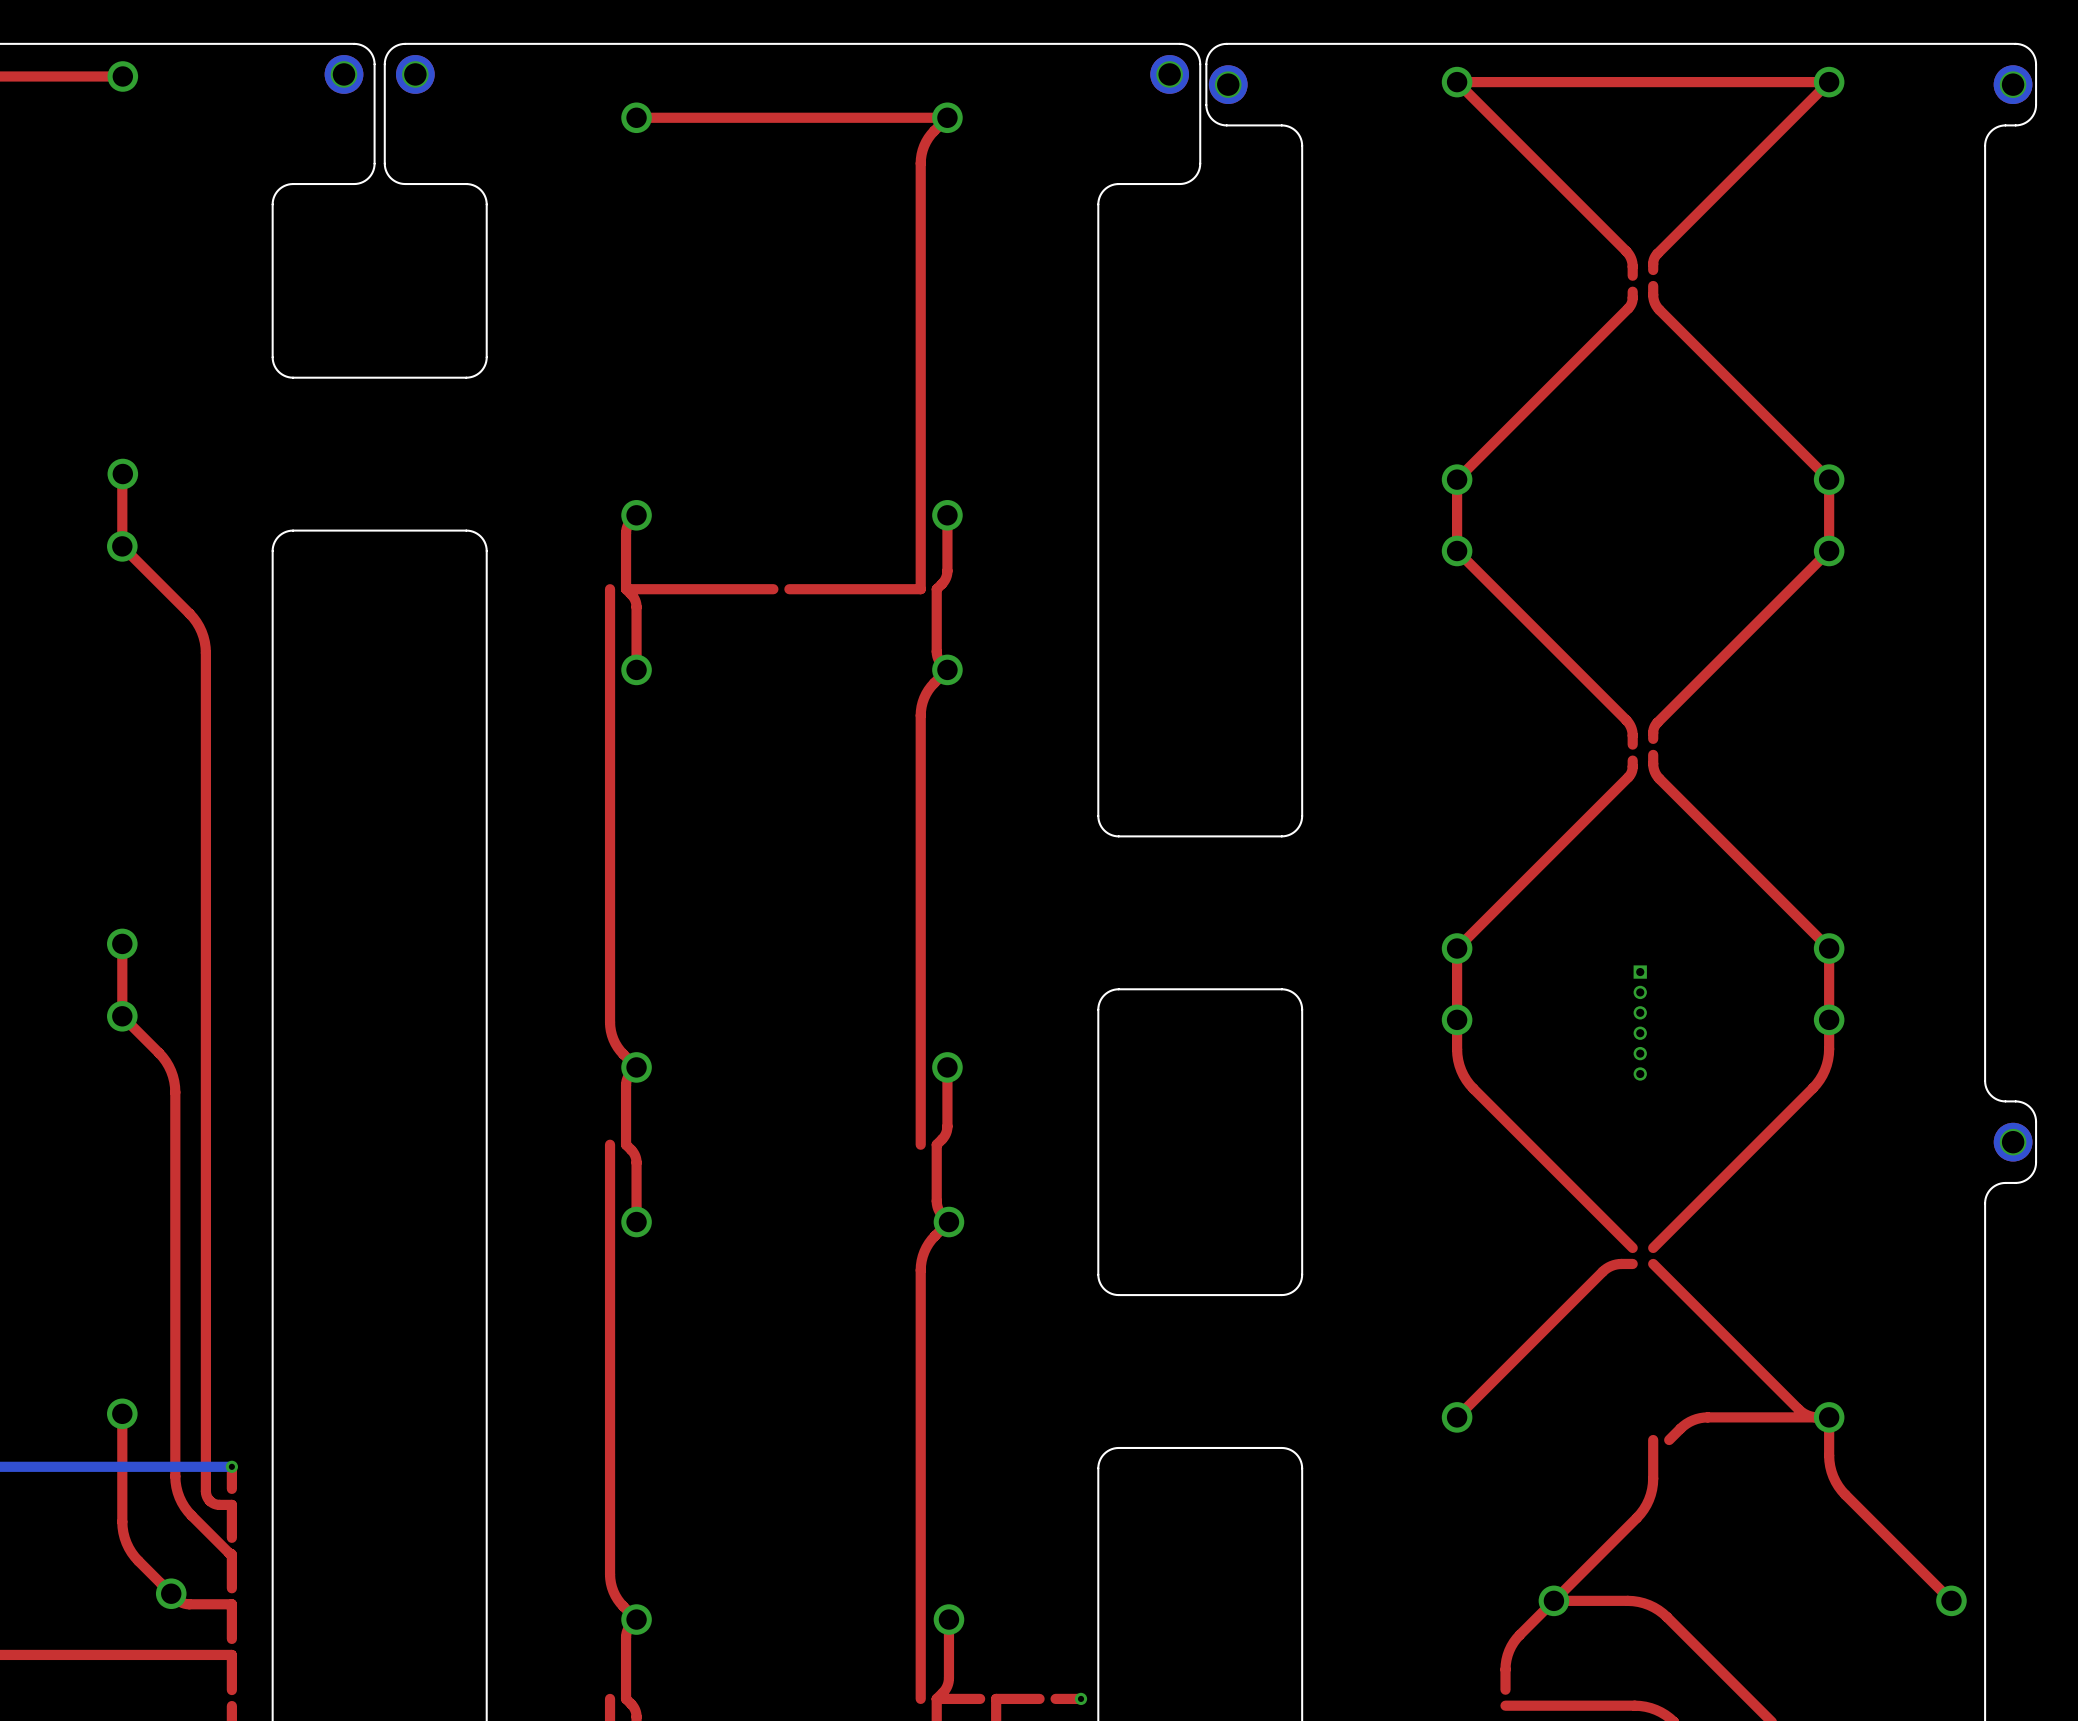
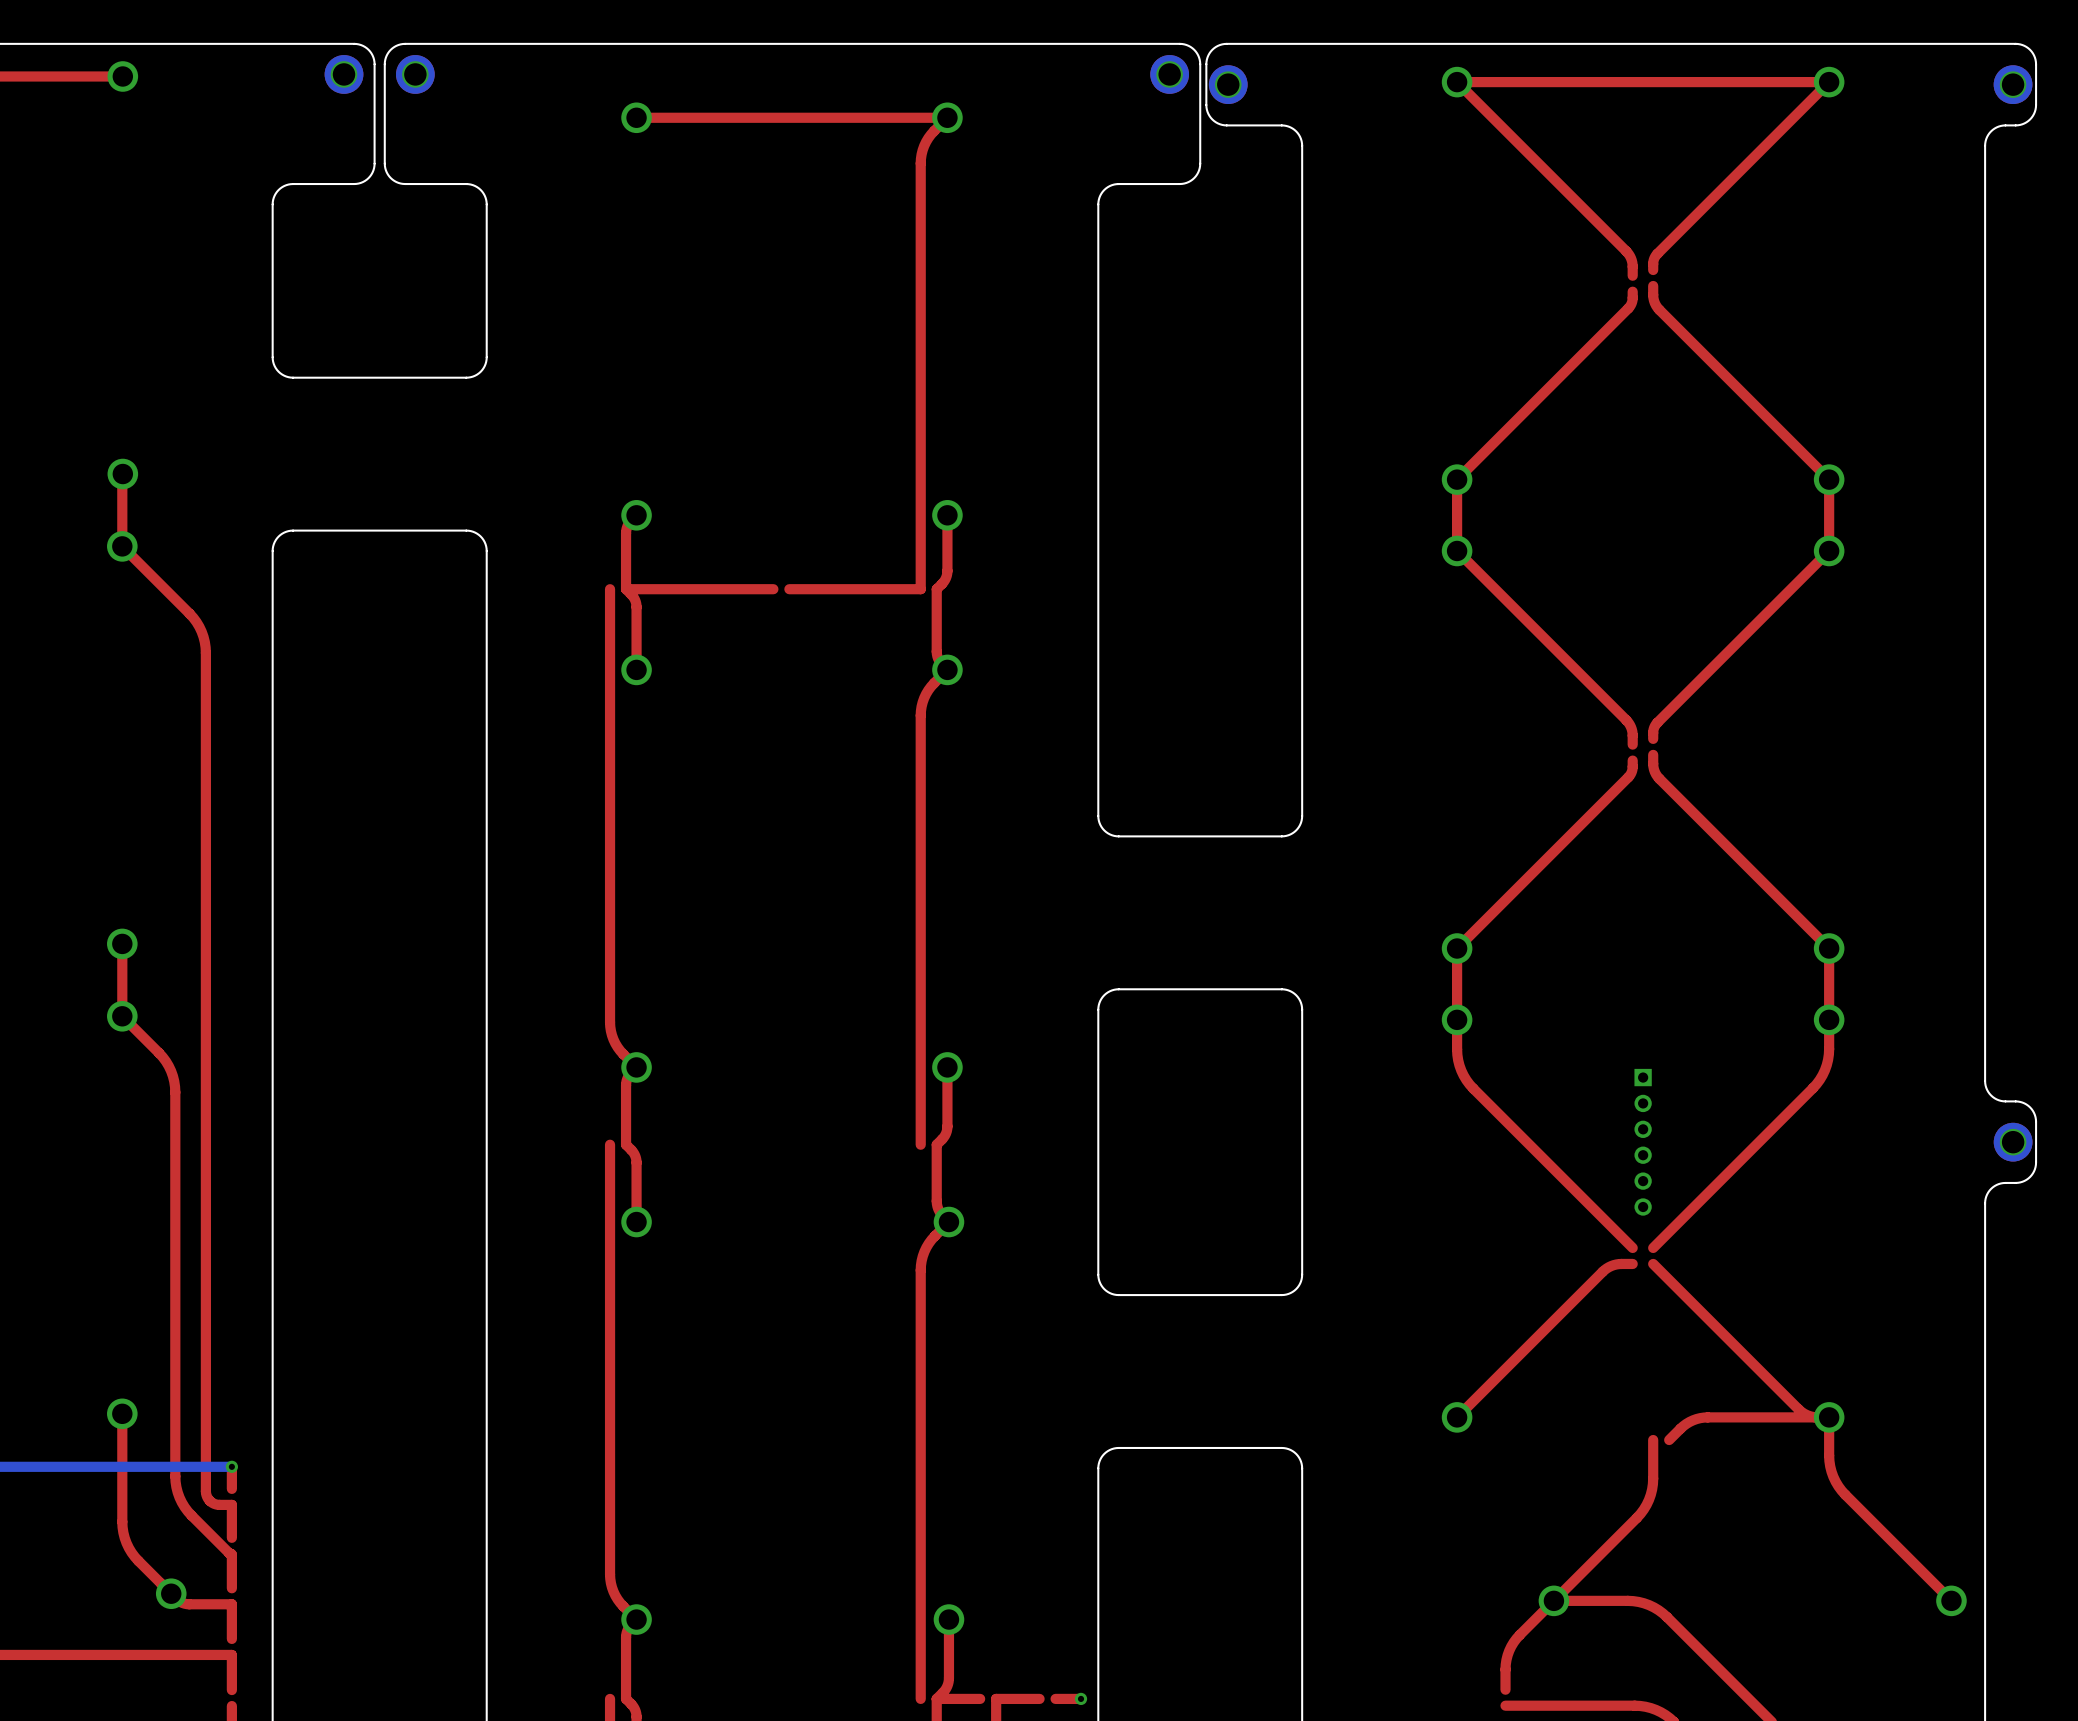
part: (1640, 1023) -> none
part: none -> (1643, 1142)

